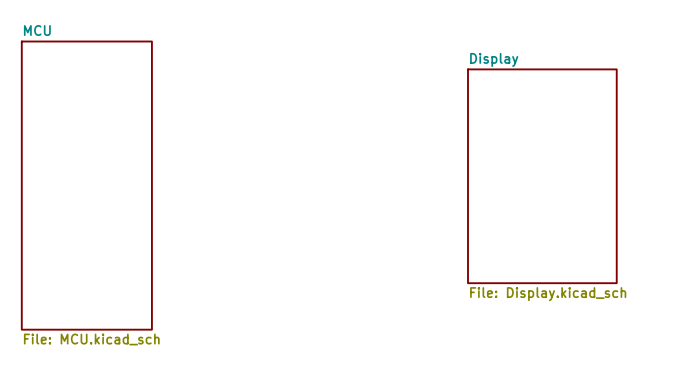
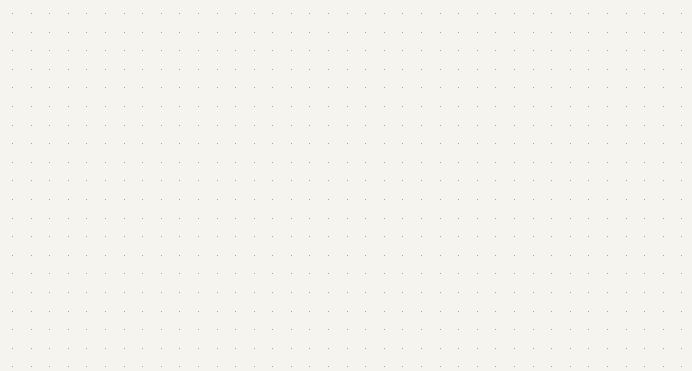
sheet Display: File: Display.kicad_sch (542, 176) -> none
sheet MCU: File: MCU.kicad_sch (86, 185) -> none

